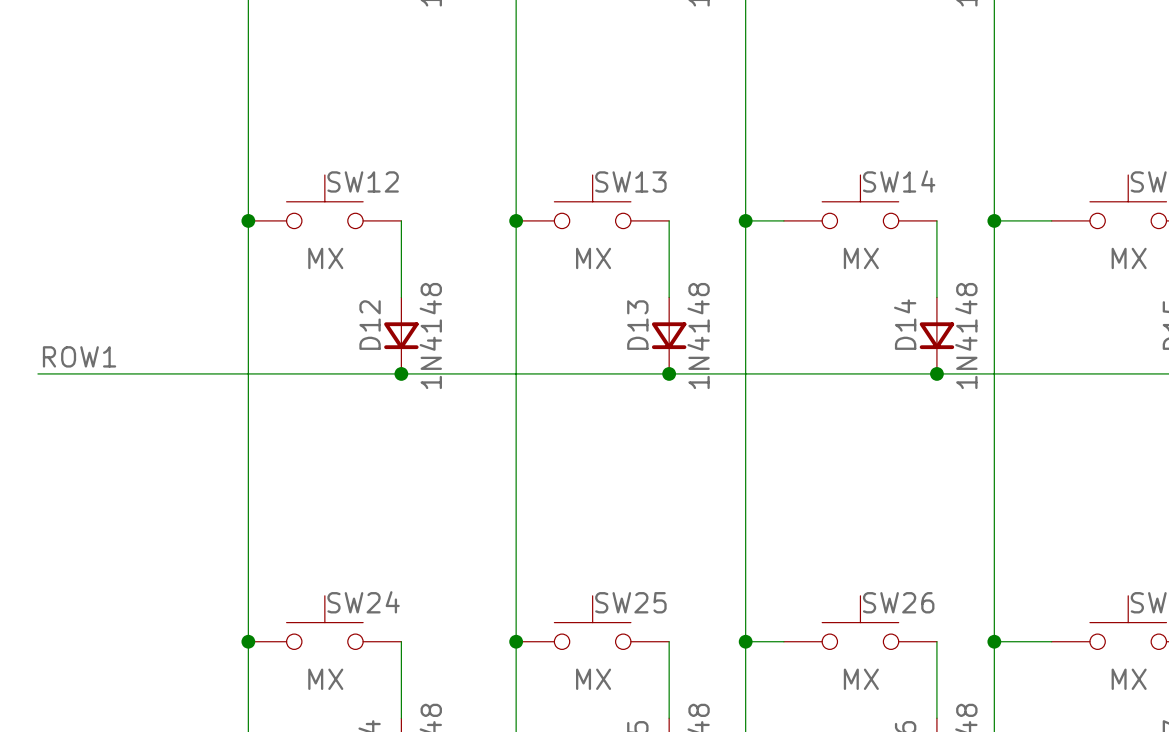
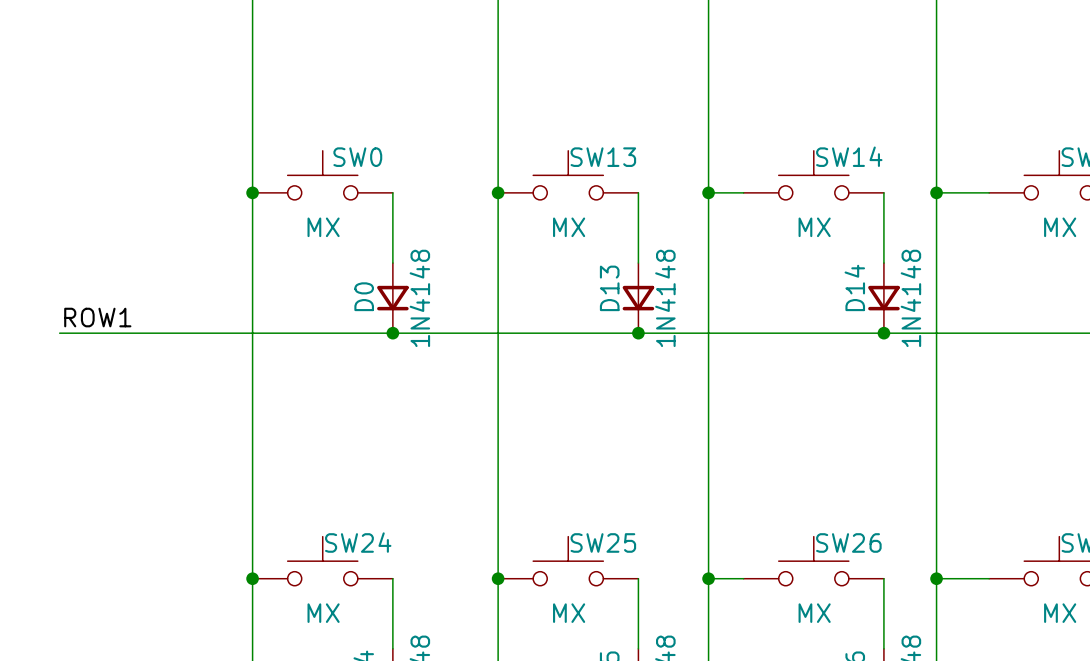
SW12 name: SW12 (363, 181) -> SW0 (357, 157)
D12 name: D12 (370, 325) -> D0 (364, 296)

